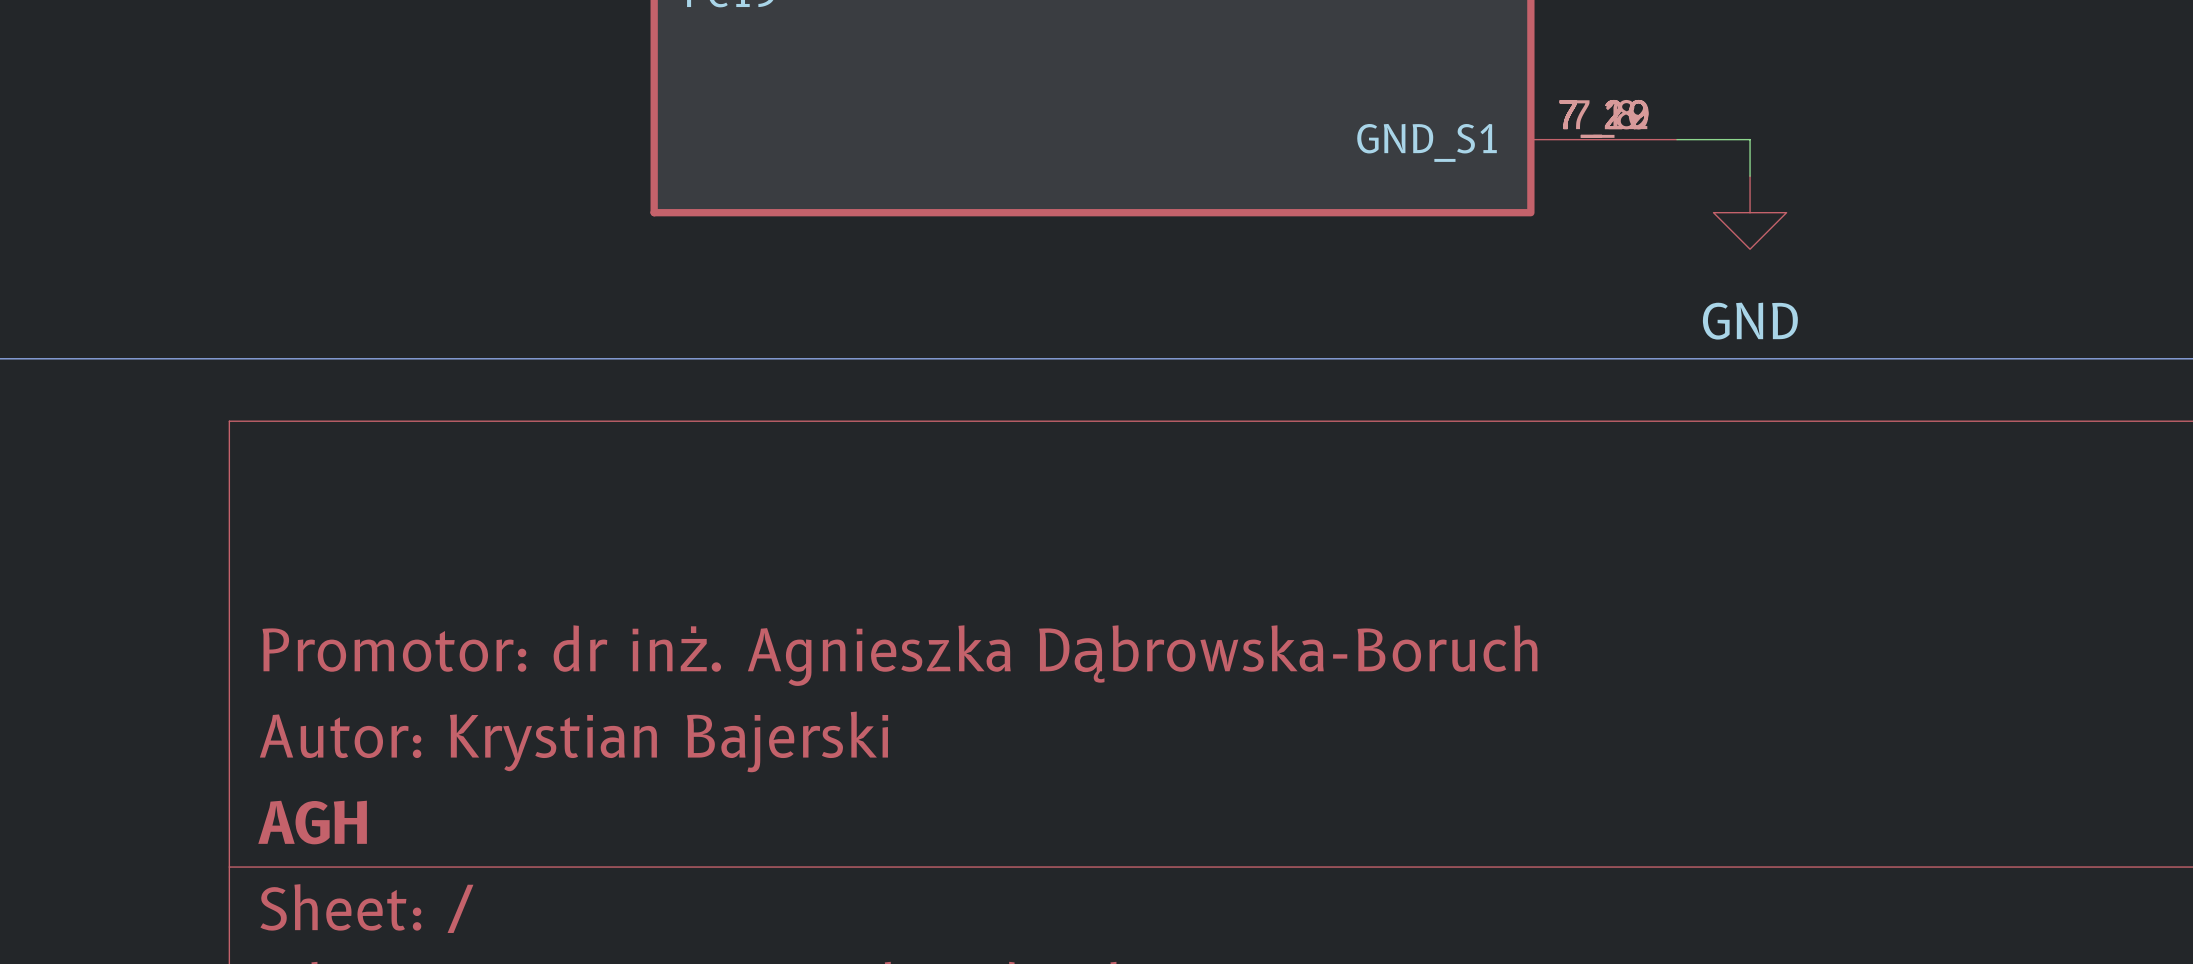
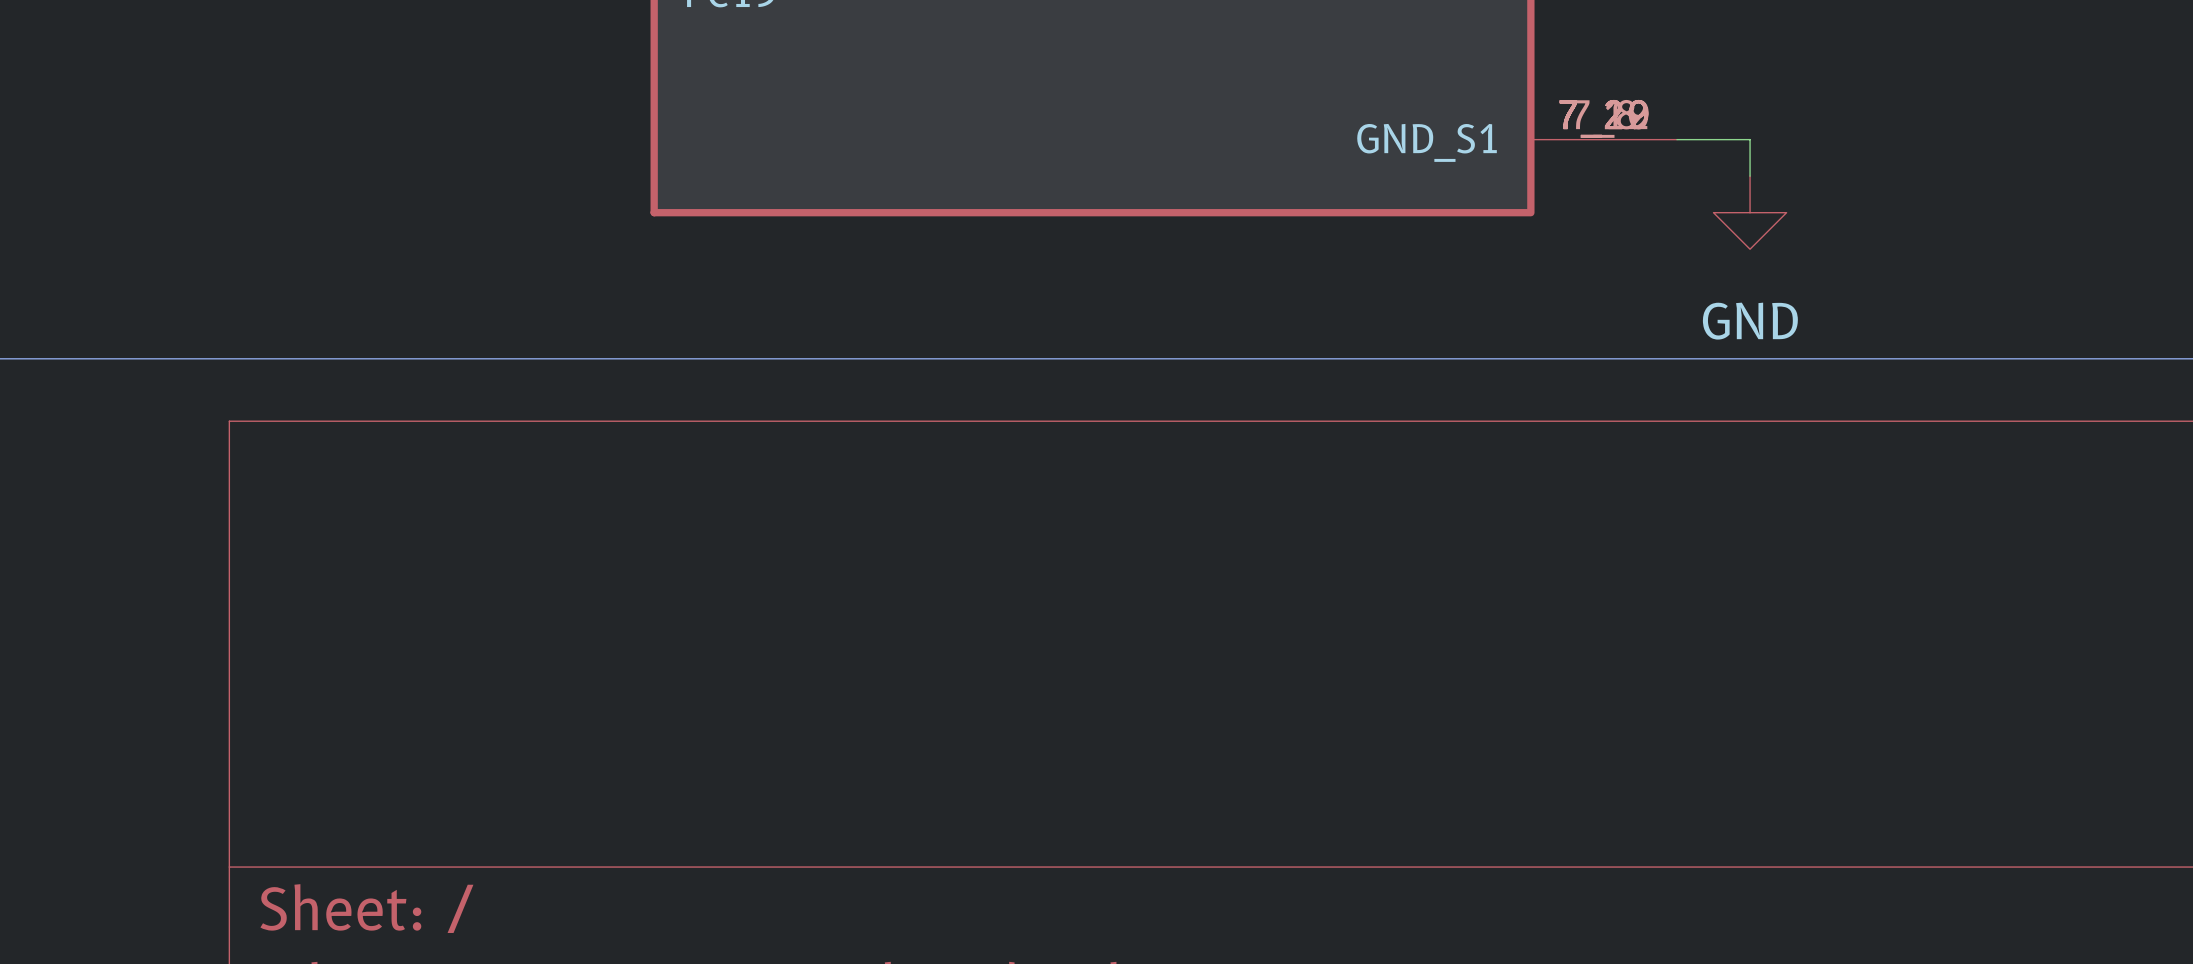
title block: Promotor: dr inż. Agnieszka Dąbrowska-Boruch (899, 655) -> none
title block: Autor: Krystian Bajerski (574, 741) -> none
title block: AGH (312, 822) -> none

